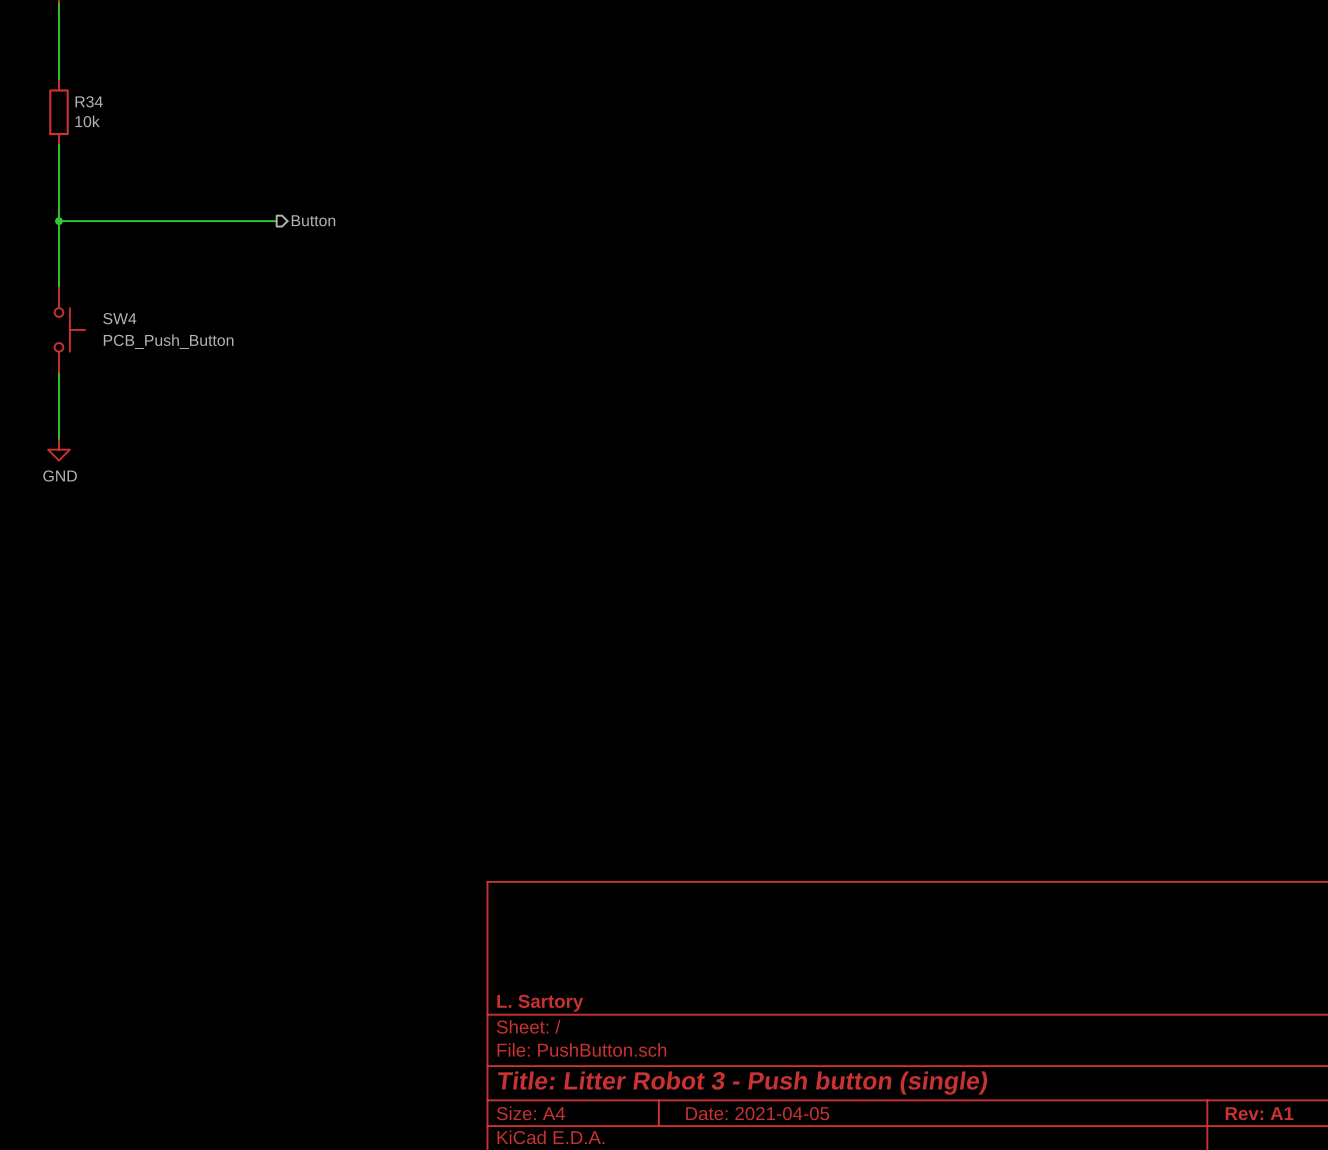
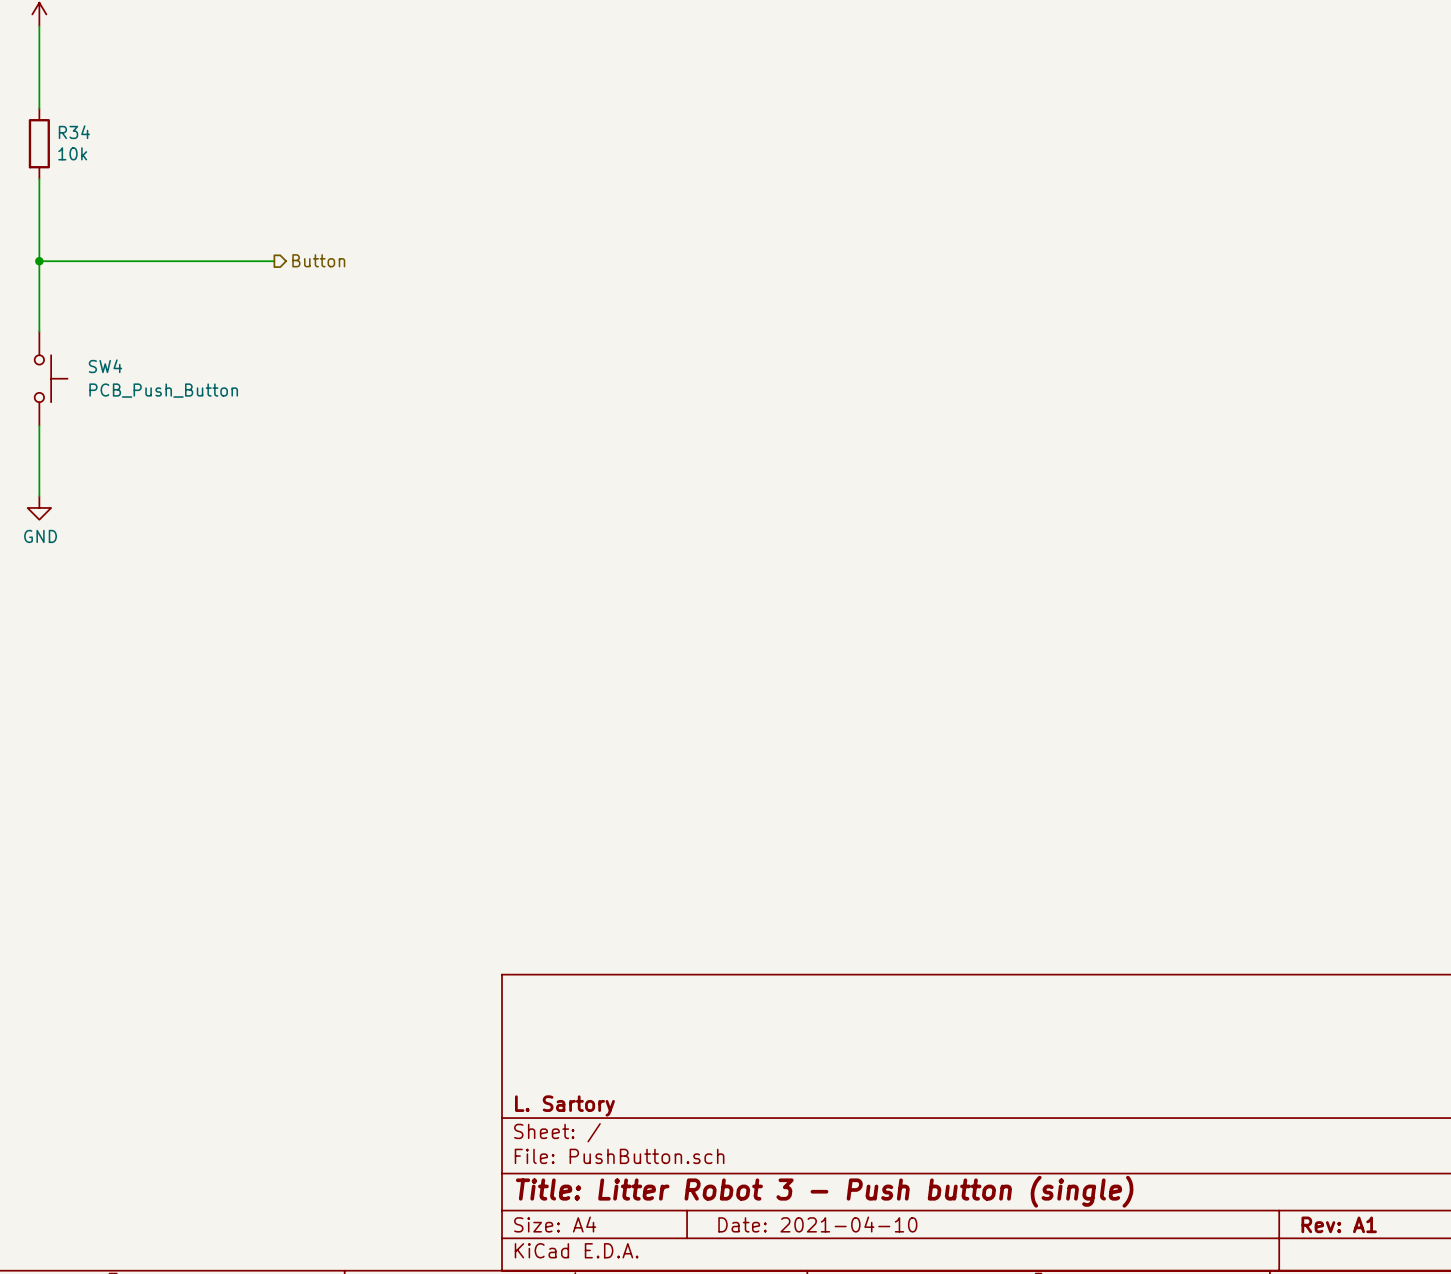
title block: Date: 2021-04-05 (757, 1113) -> Date: 2021-04-10 (817, 1224)

